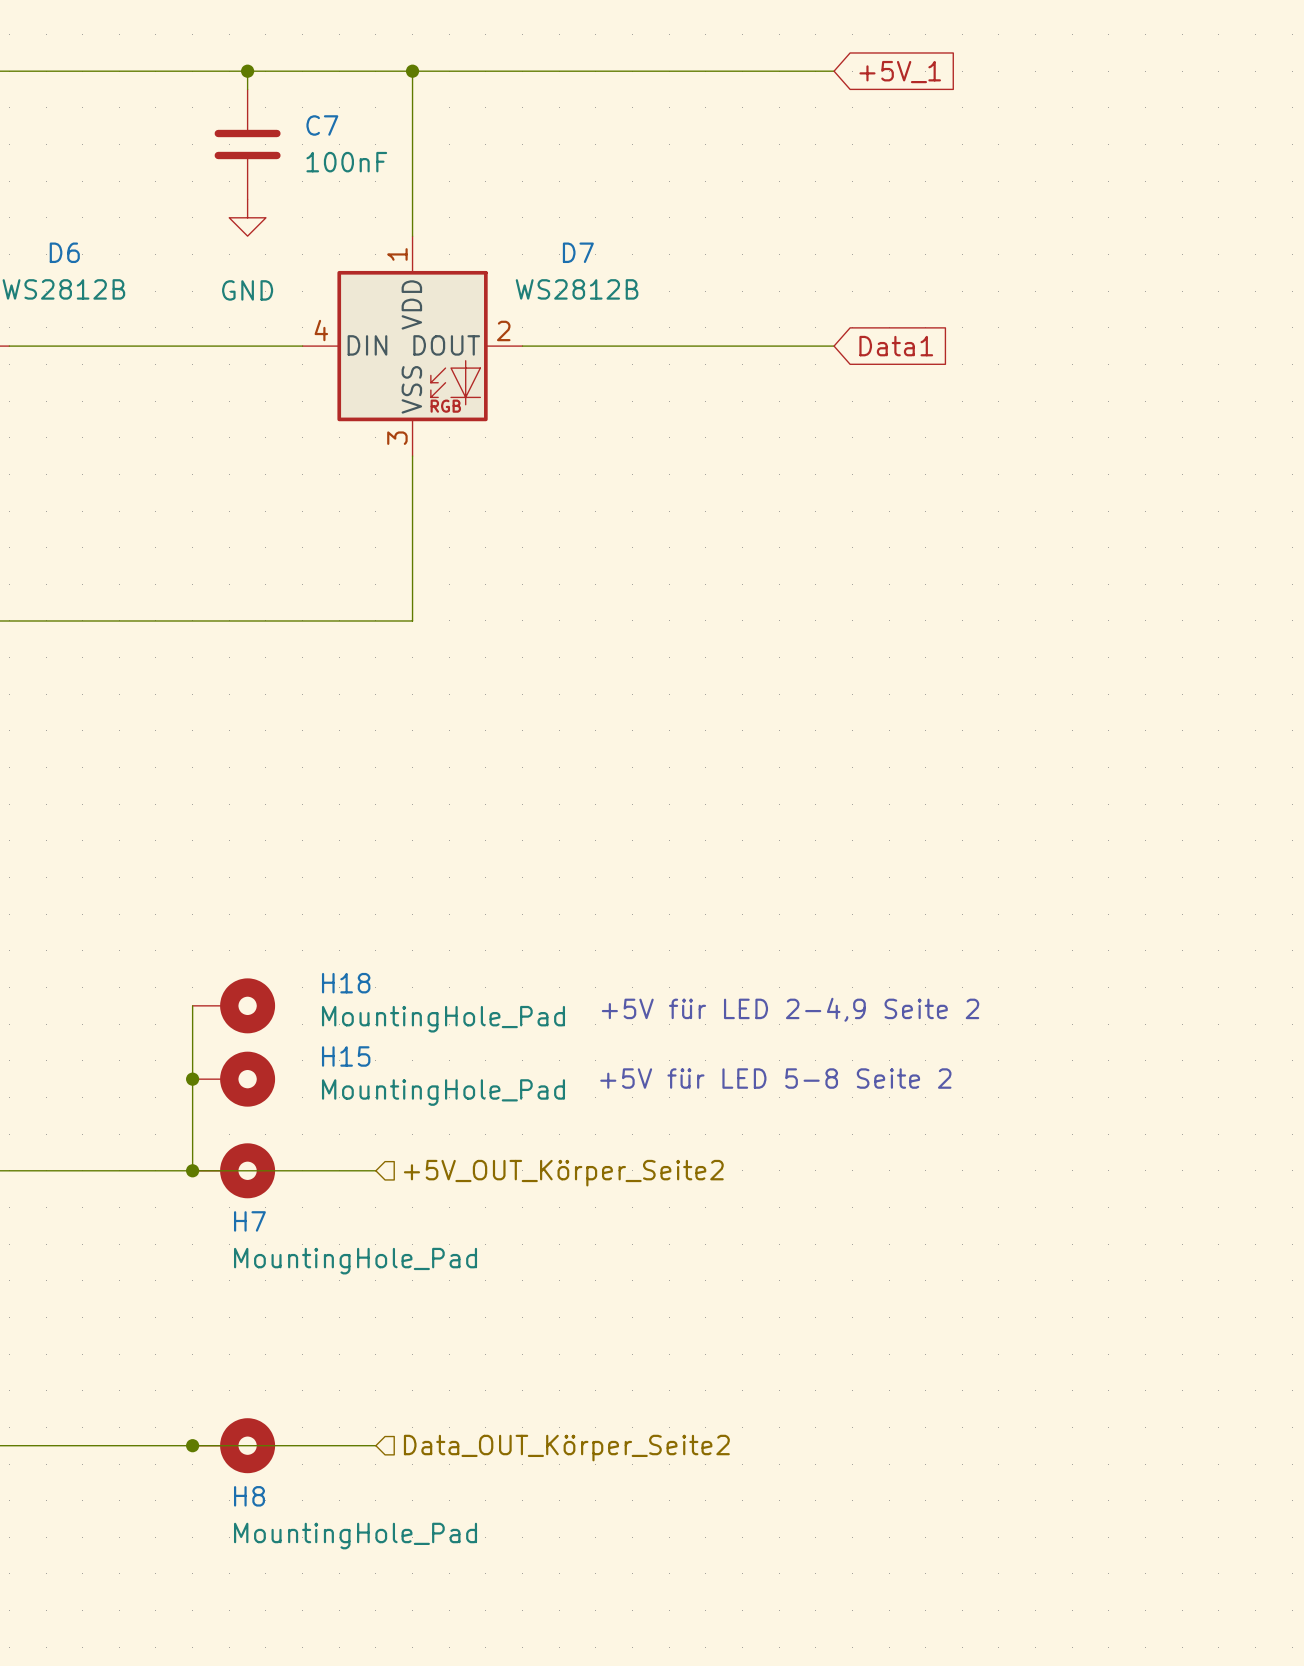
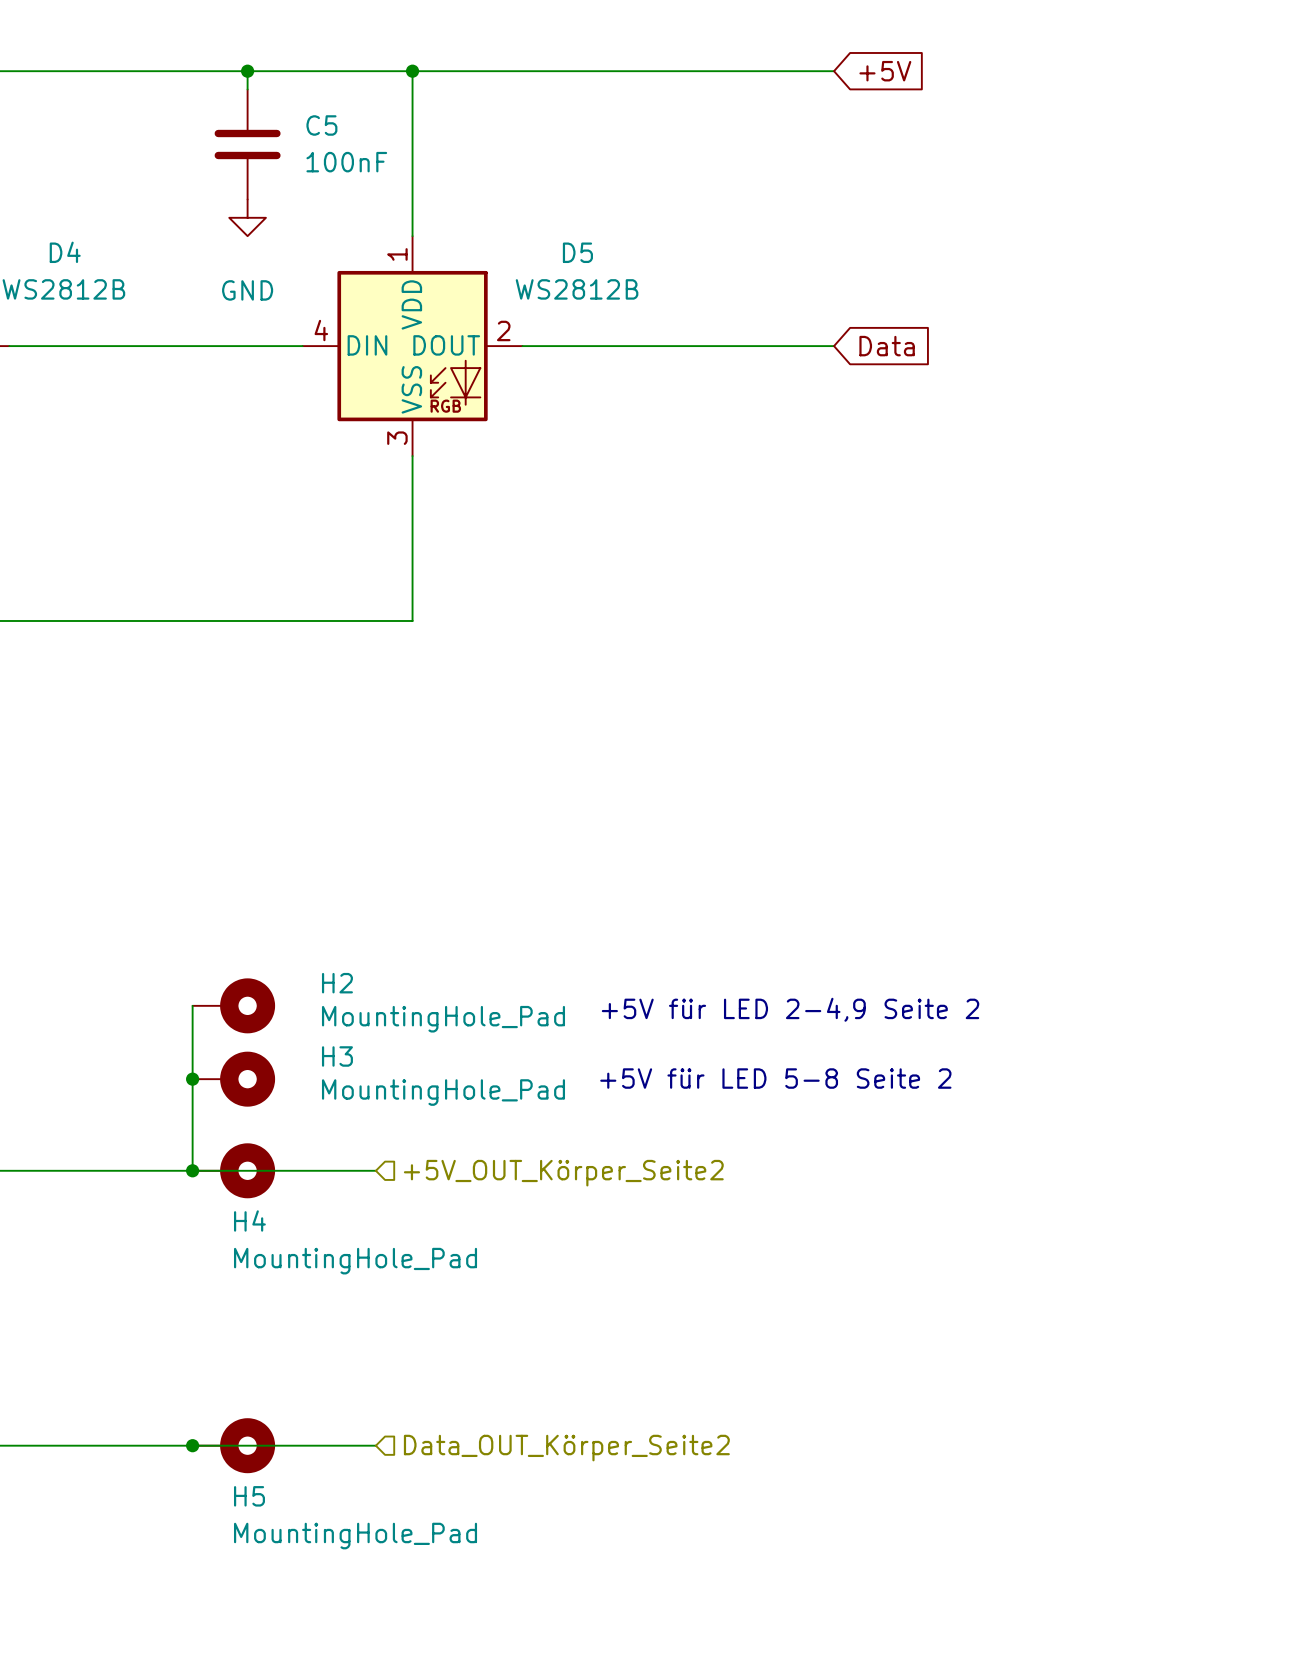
global label: +5V_1 (900, 72) -> +5V (885, 71)
C7 name: C7 (322, 125) -> C5 (321, 125)
D6 name: D6 (64, 252) -> D4 (65, 252)
D7 name: D7 (578, 252) -> D5 (577, 252)
global label: Data1 (896, 346) -> Data (887, 346)
H18 name: H18 (346, 983) -> H2 (337, 983)
H15 name: H15 (346, 1056) -> H3 (337, 1056)
H7 name: H7 (249, 1221) -> H4 (249, 1220)
H8 name: H8 (249, 1496) -> H5 (249, 1496)

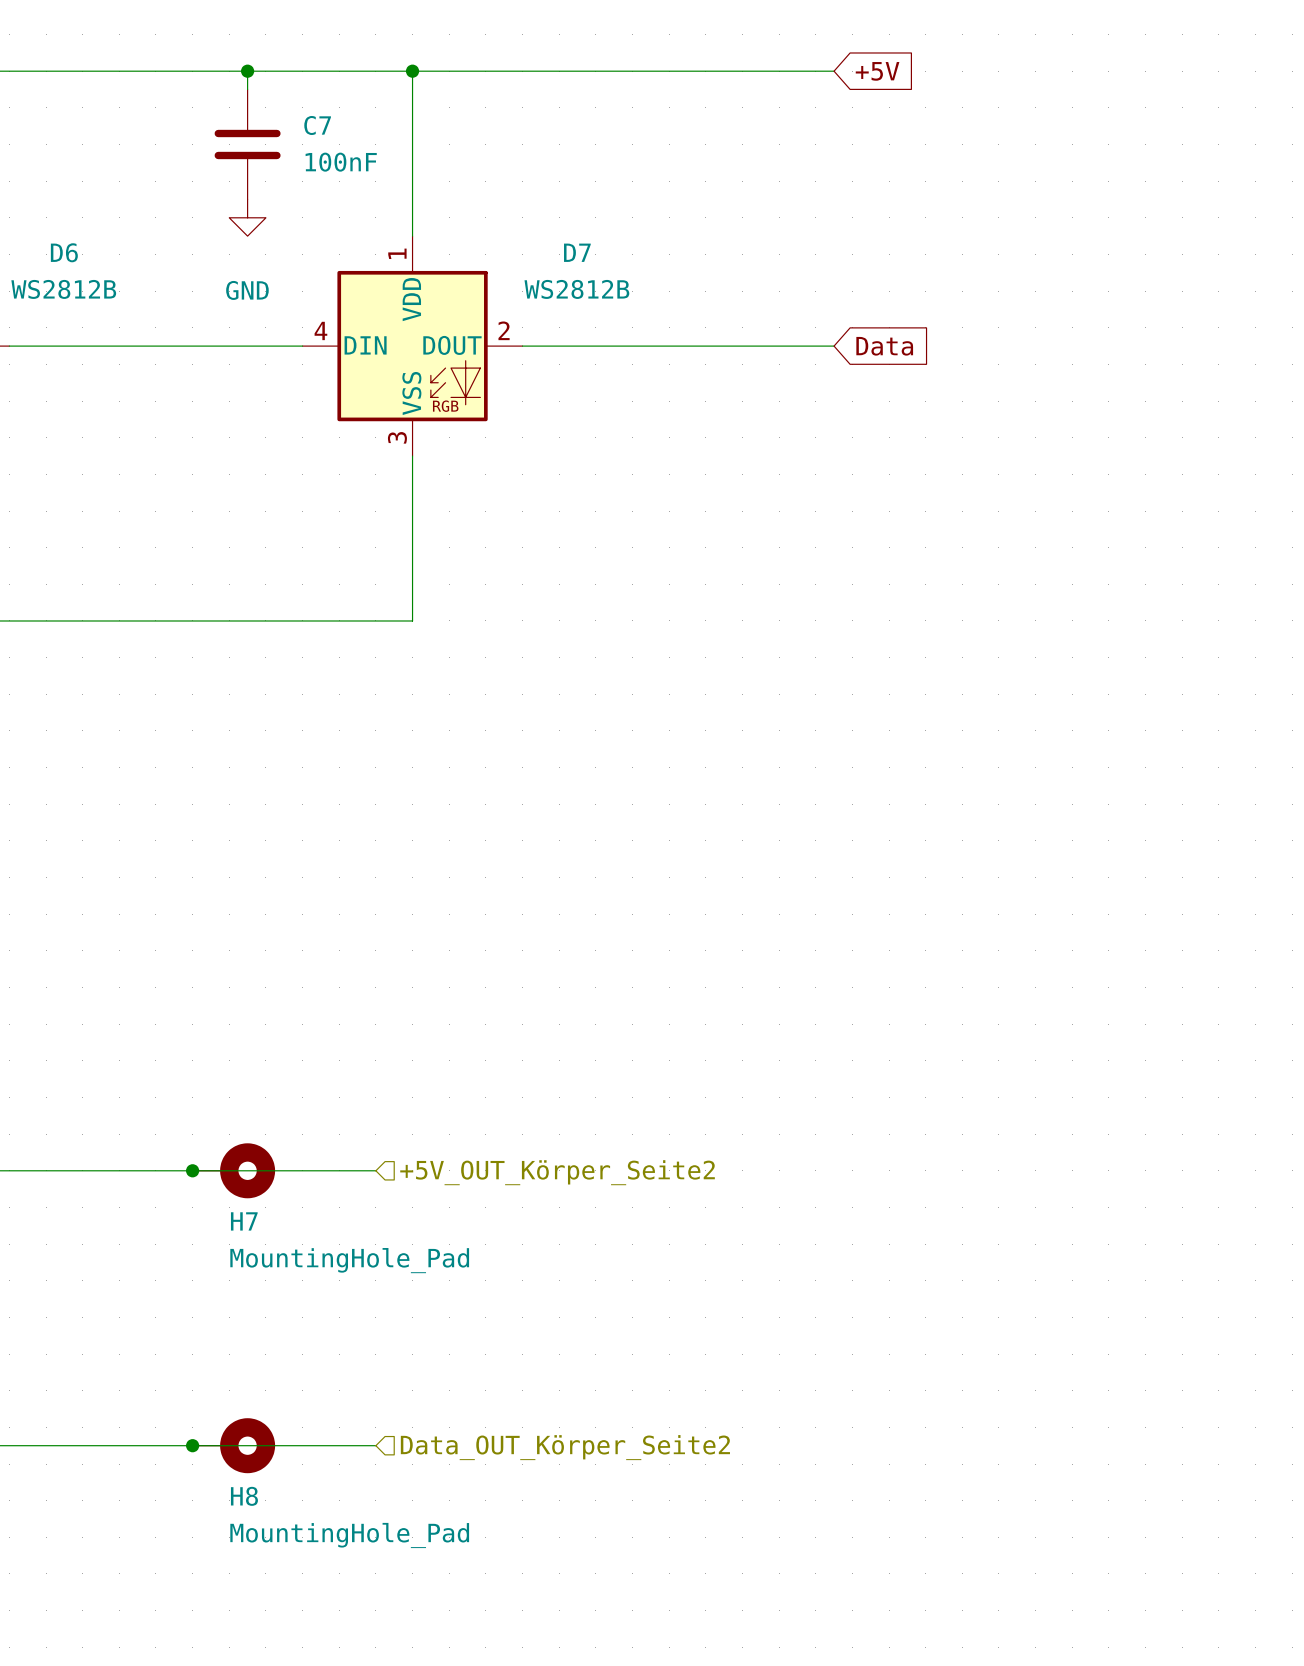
C5 name: C5 (321, 125) -> C7 (317, 125)
D4 name: D4 (65, 252) -> D6 (64, 252)
D5 name: D5 (577, 252) -> D7 (577, 252)
wire: (192, 1005) (192, 1170) -> none
H2: MountingHole_Pad (233, 1005) -> none
text: +5V für LED 2-4,9 Seite 2 (790, 1009) -> none
text: +5V für LED 5-8 Seite 2 (775, 1078) -> none
junction: (192, 1079) -> none
H3: MountingHole_Pad (233, 1079) -> none
H4 name: H4 (249, 1220) -> H7 (244, 1221)
H5 name: H5 (249, 1496) -> H8 (244, 1496)

